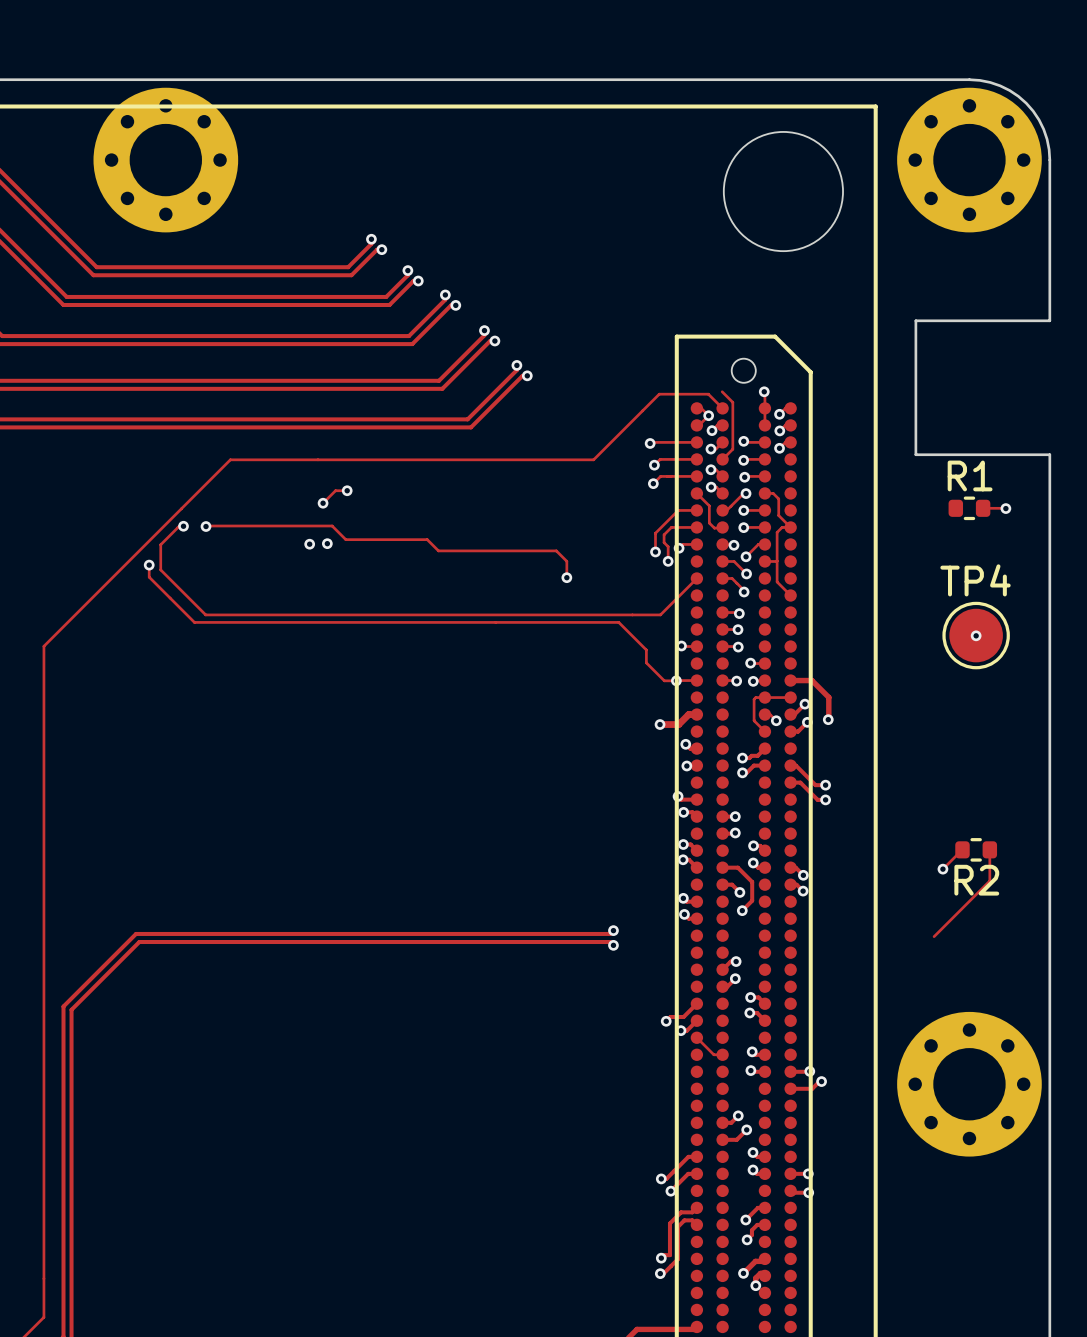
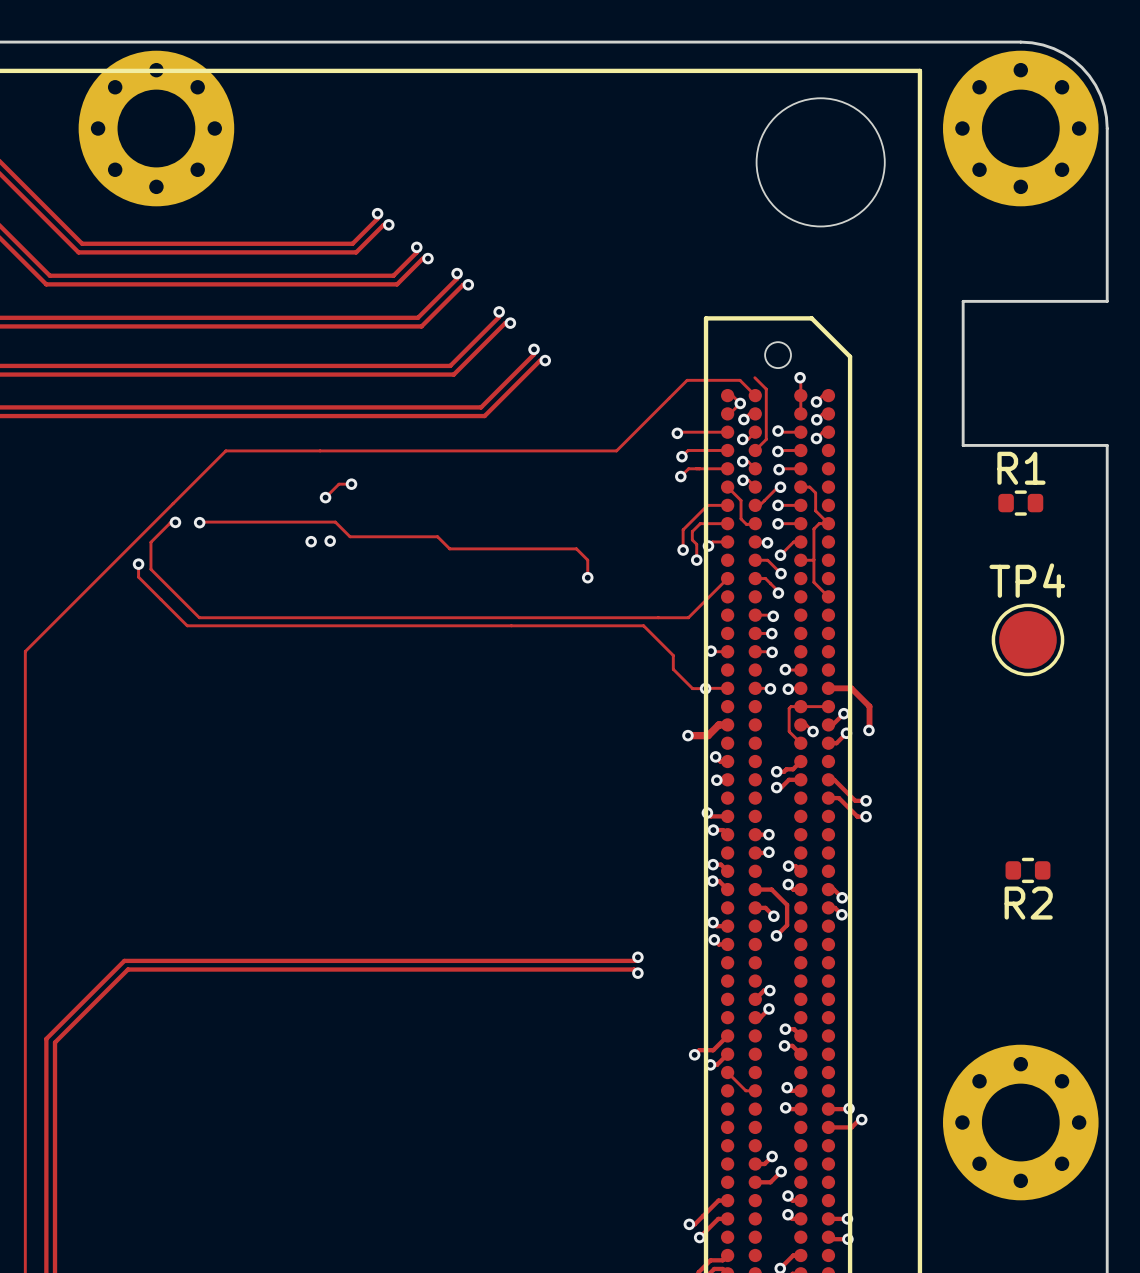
track: (983, 508) (1005, 508) -> none
via: (1005, 508) -> none
via: (976, 635) -> none
track: (962, 849) (942, 869) -> none
track: (989, 849) (989, 880) (934, 936) -> none
via: (942, 869) -> none

